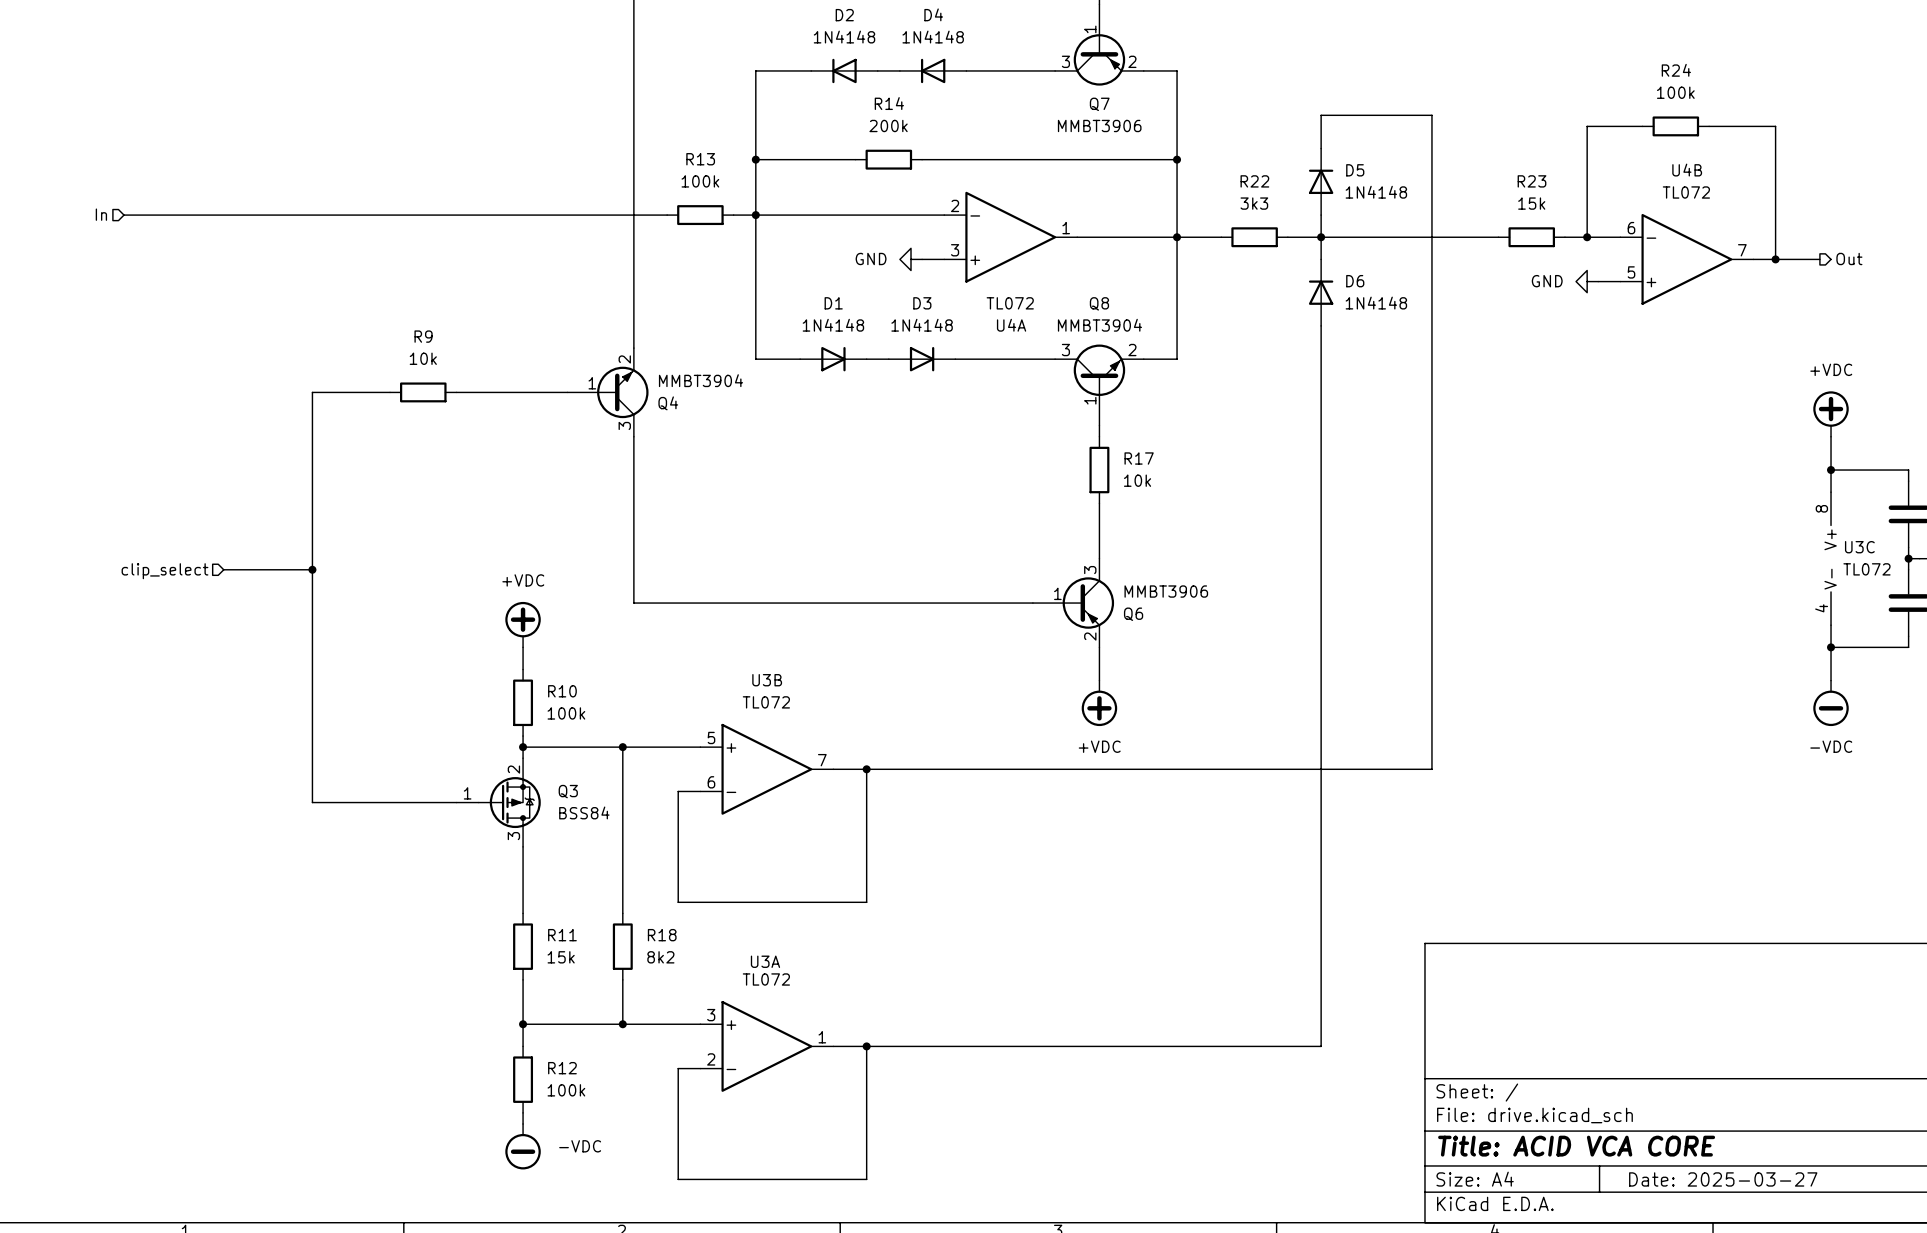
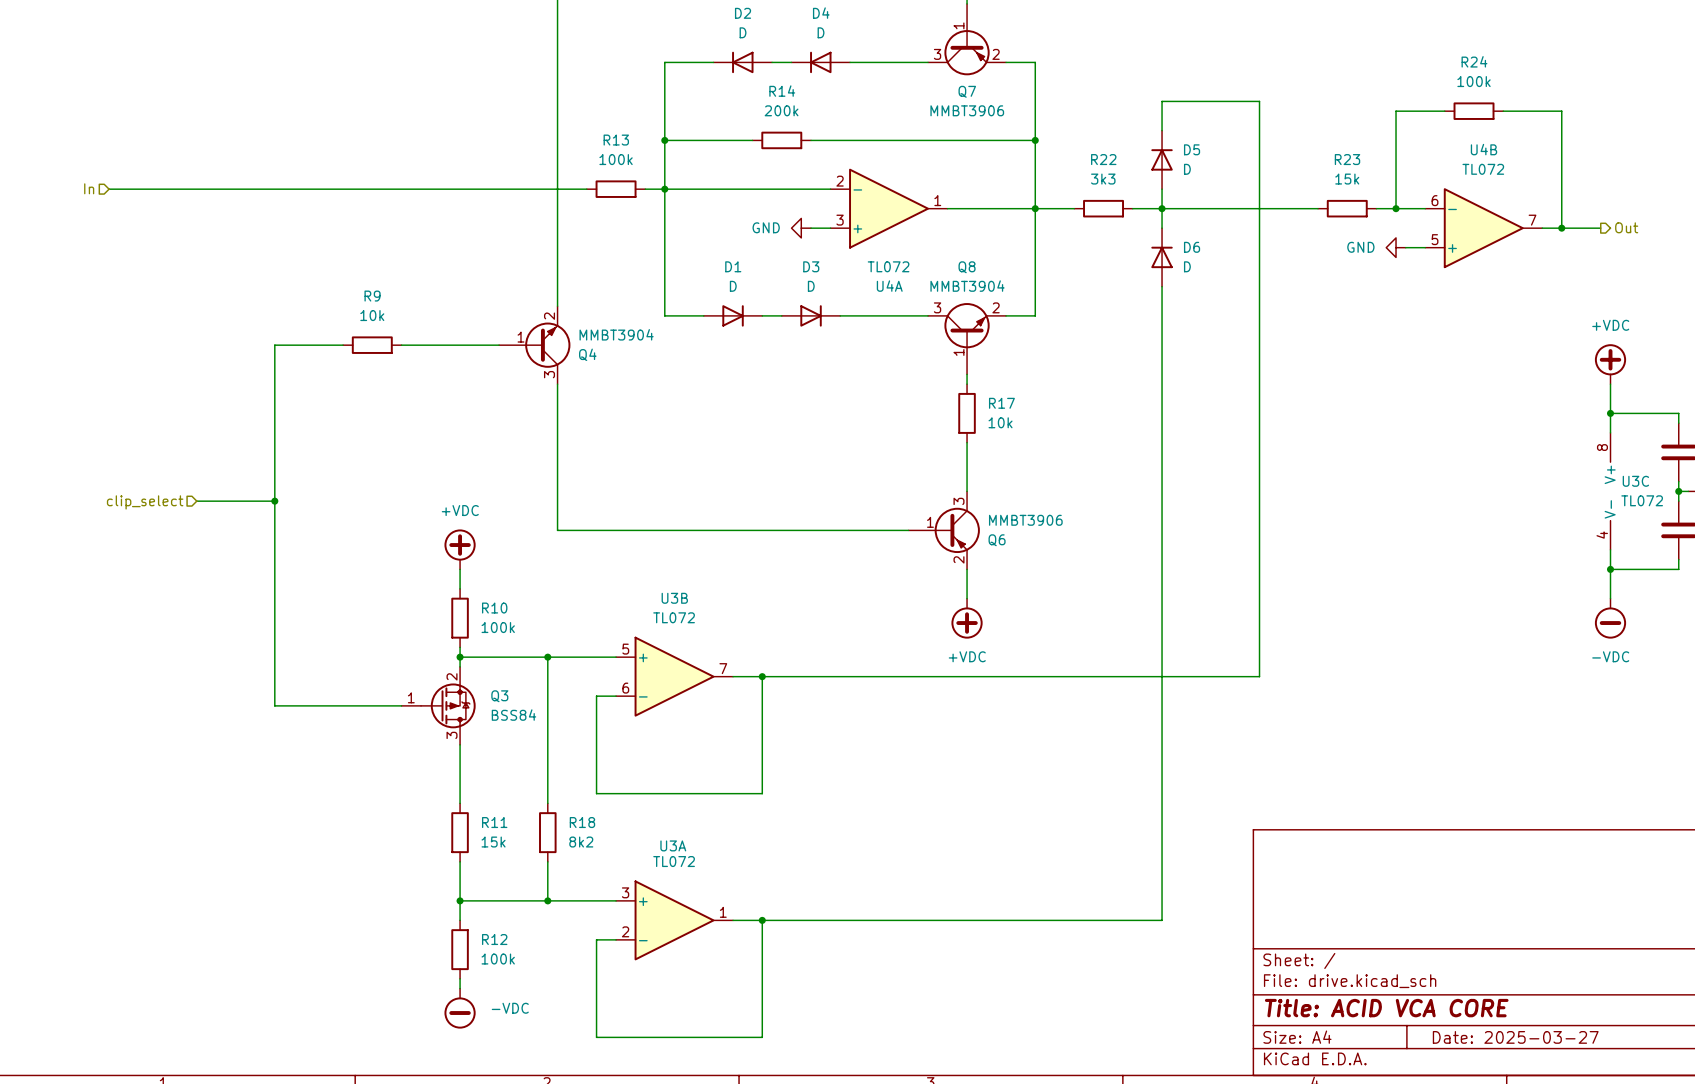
D2 value: 1N4148 (844, 37) -> D (743, 32)
D4 value: 1N4148 (933, 37) -> D (821, 32)
D5 value: 1N4148 (1376, 192) -> D (1187, 169)
D6 value: 1N4148 (1376, 303) -> D (1187, 266)
D1 value: 1N4148 (833, 325) -> D (733, 286)
D3 value: 1N4148 (922, 325) -> D (811, 286)

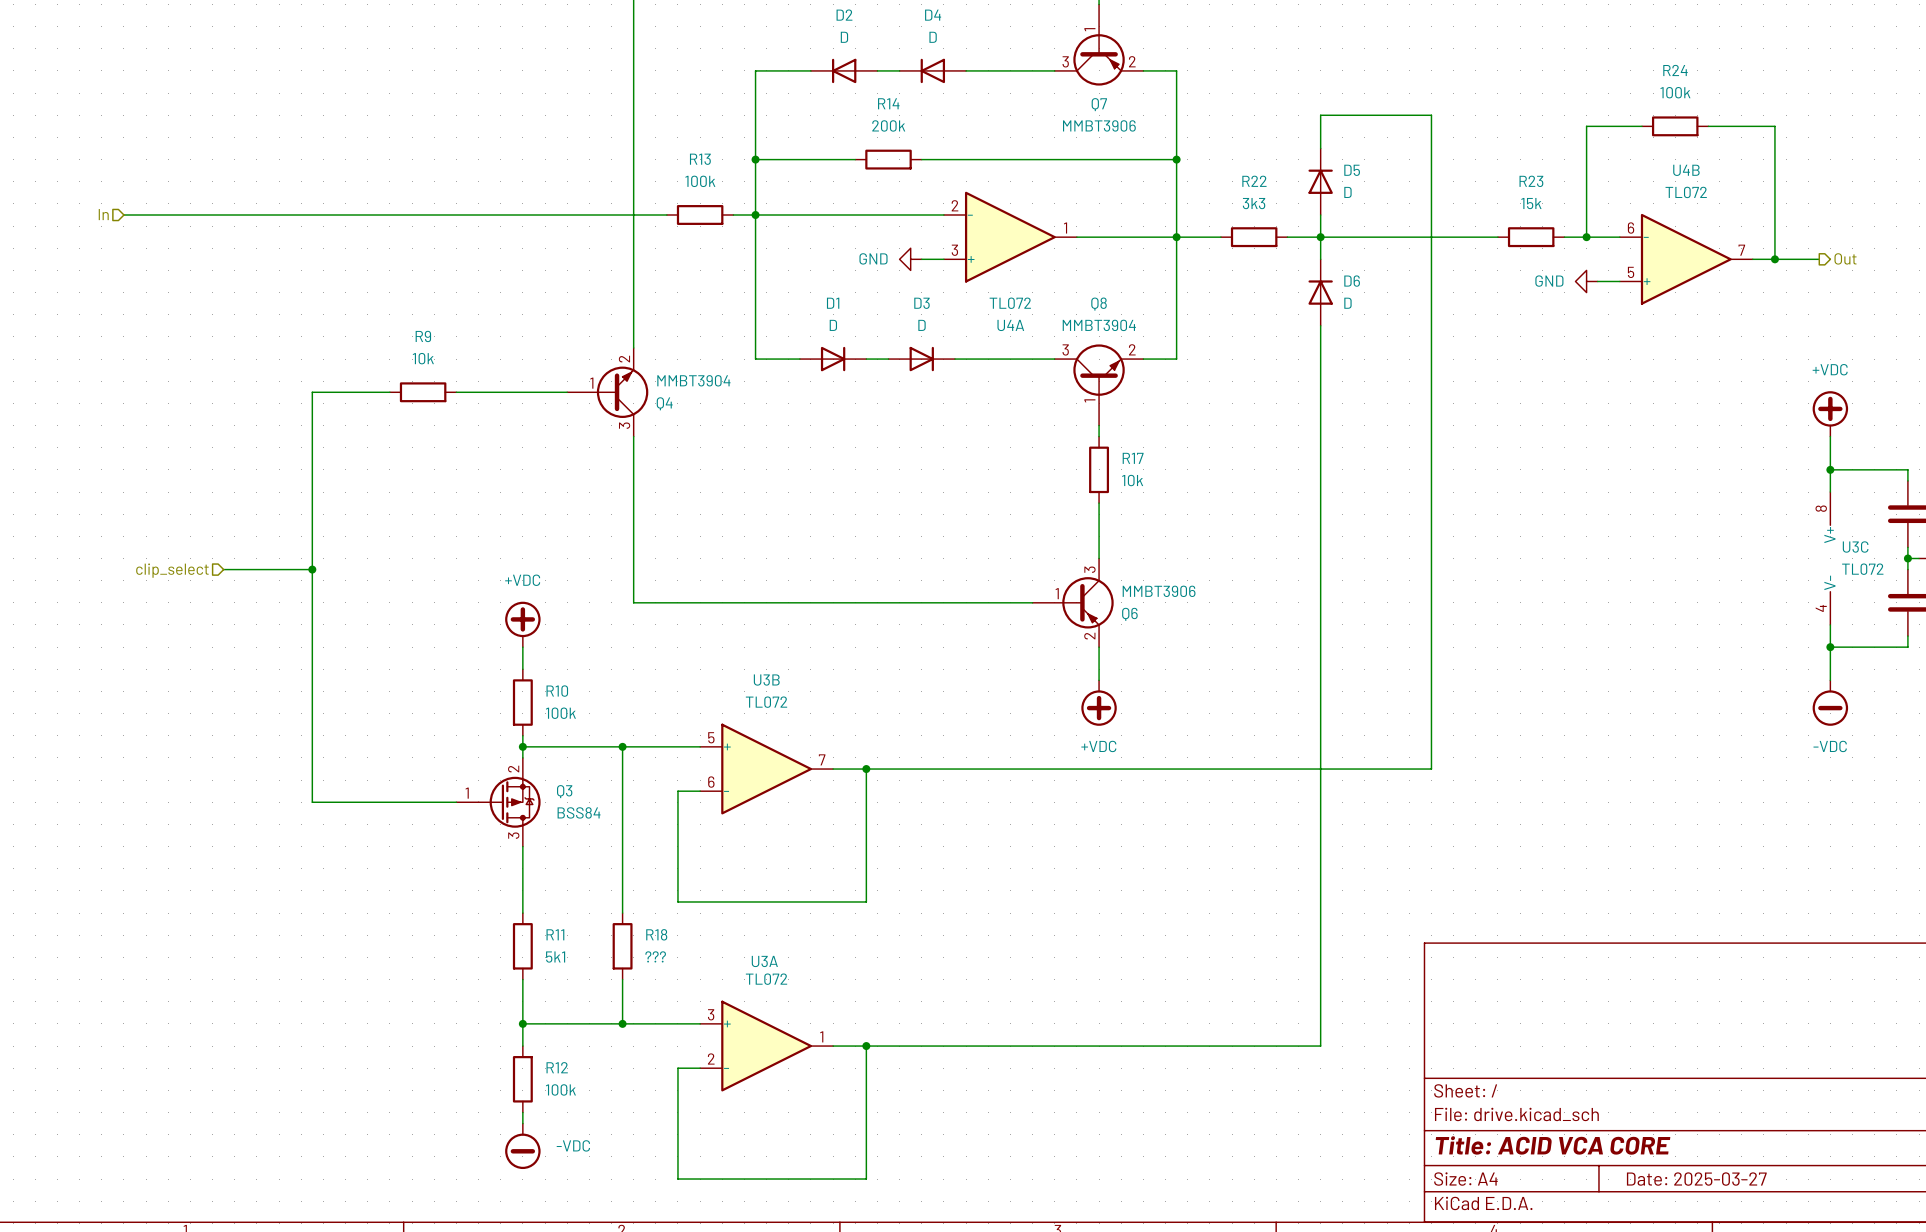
R11 value: 15k (493, 842) -> 5k1 (555, 957)
R18 value: 8k2 (581, 842) -> ??? (655, 956)

